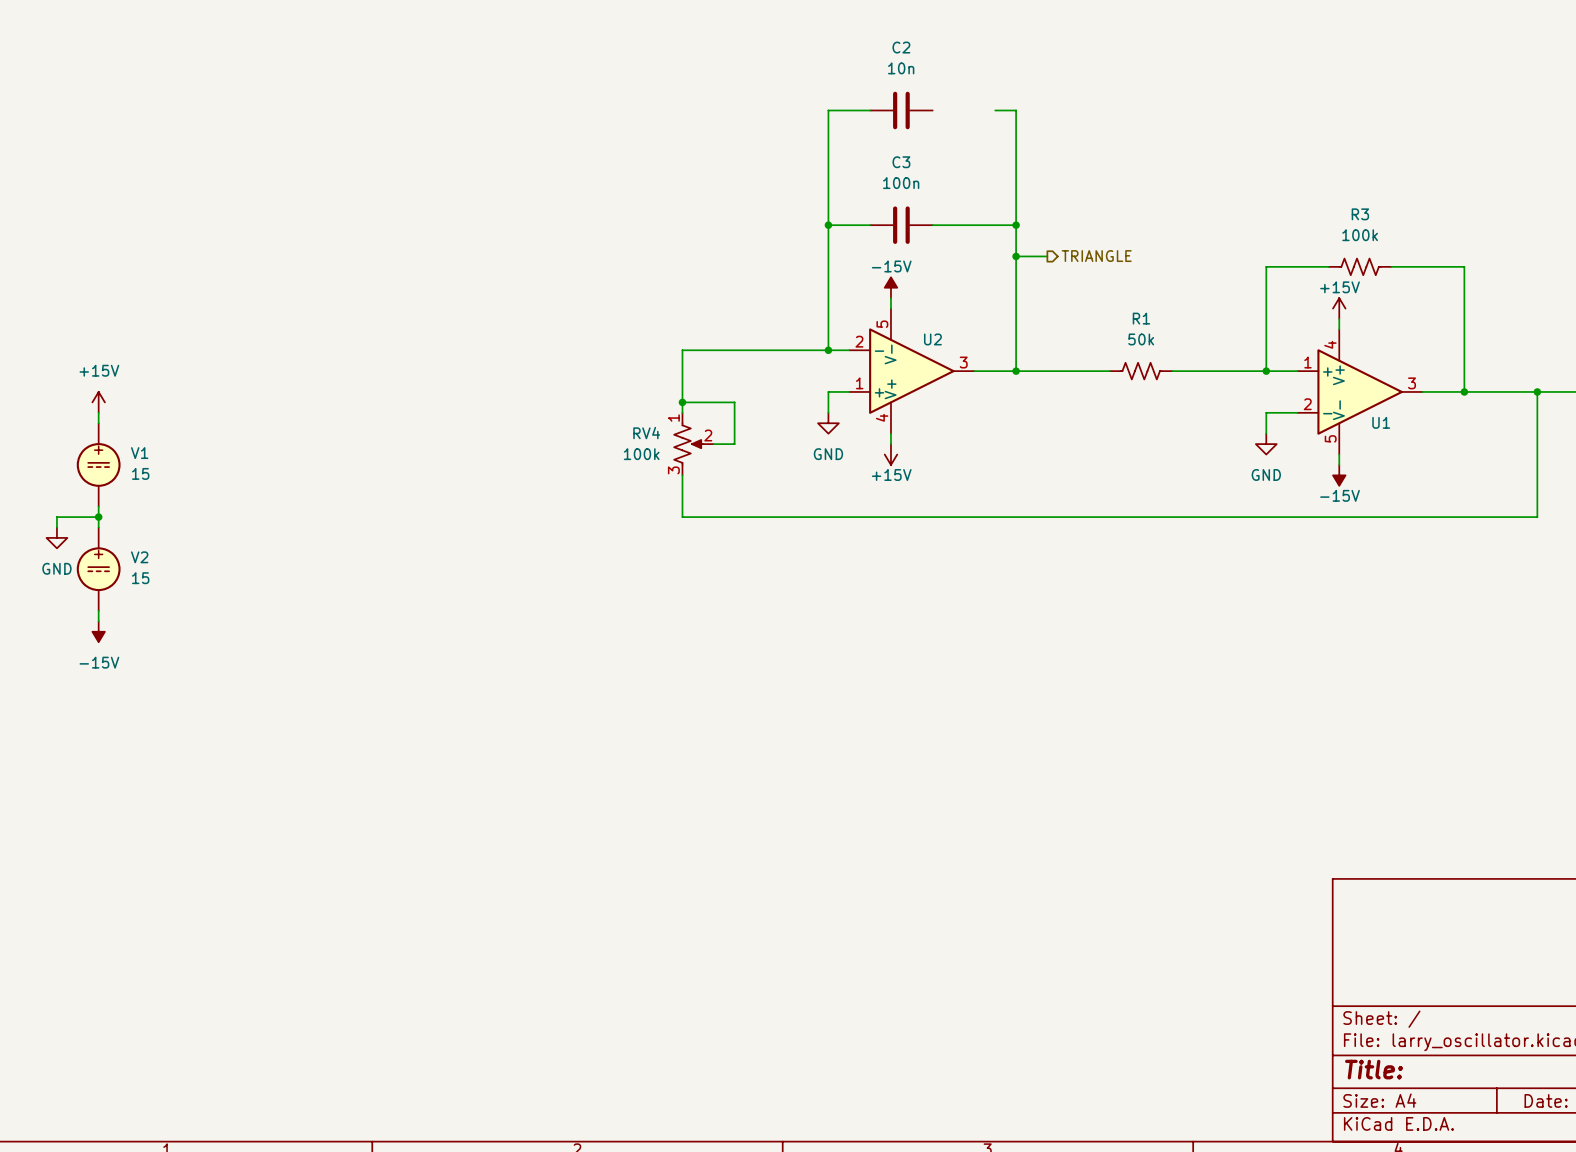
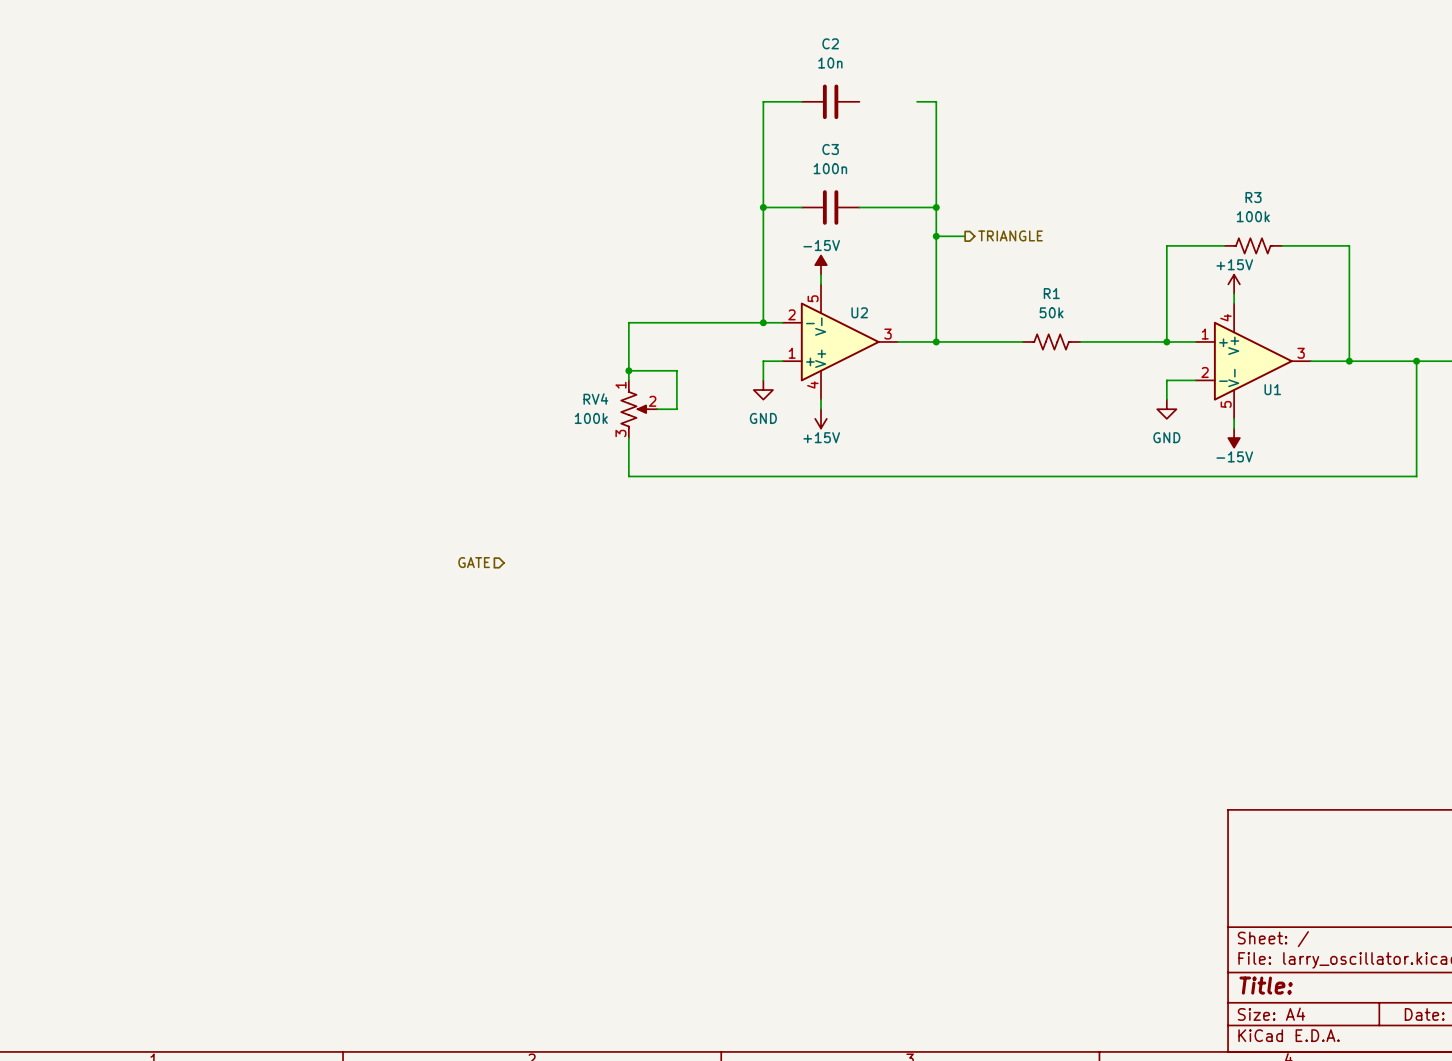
power symbol: +15V (98, 402) -> none
wire: (98, 412) (98, 423) -> none
V1: 15 (98, 464) -> none
wire: (98, 506) (98, 527) -> none
wire: (98, 517) (56, 517) (56, 527) -> none
junction: (98, 517) -> none
power symbol: GND (56, 537) -> none
V2: 15 (98, 569) -> none
wire: (98, 610) (98, 621) -> none
hierarchical label: none -> GATE (474, 562)
power symbol: -15V (98, 631) -> none

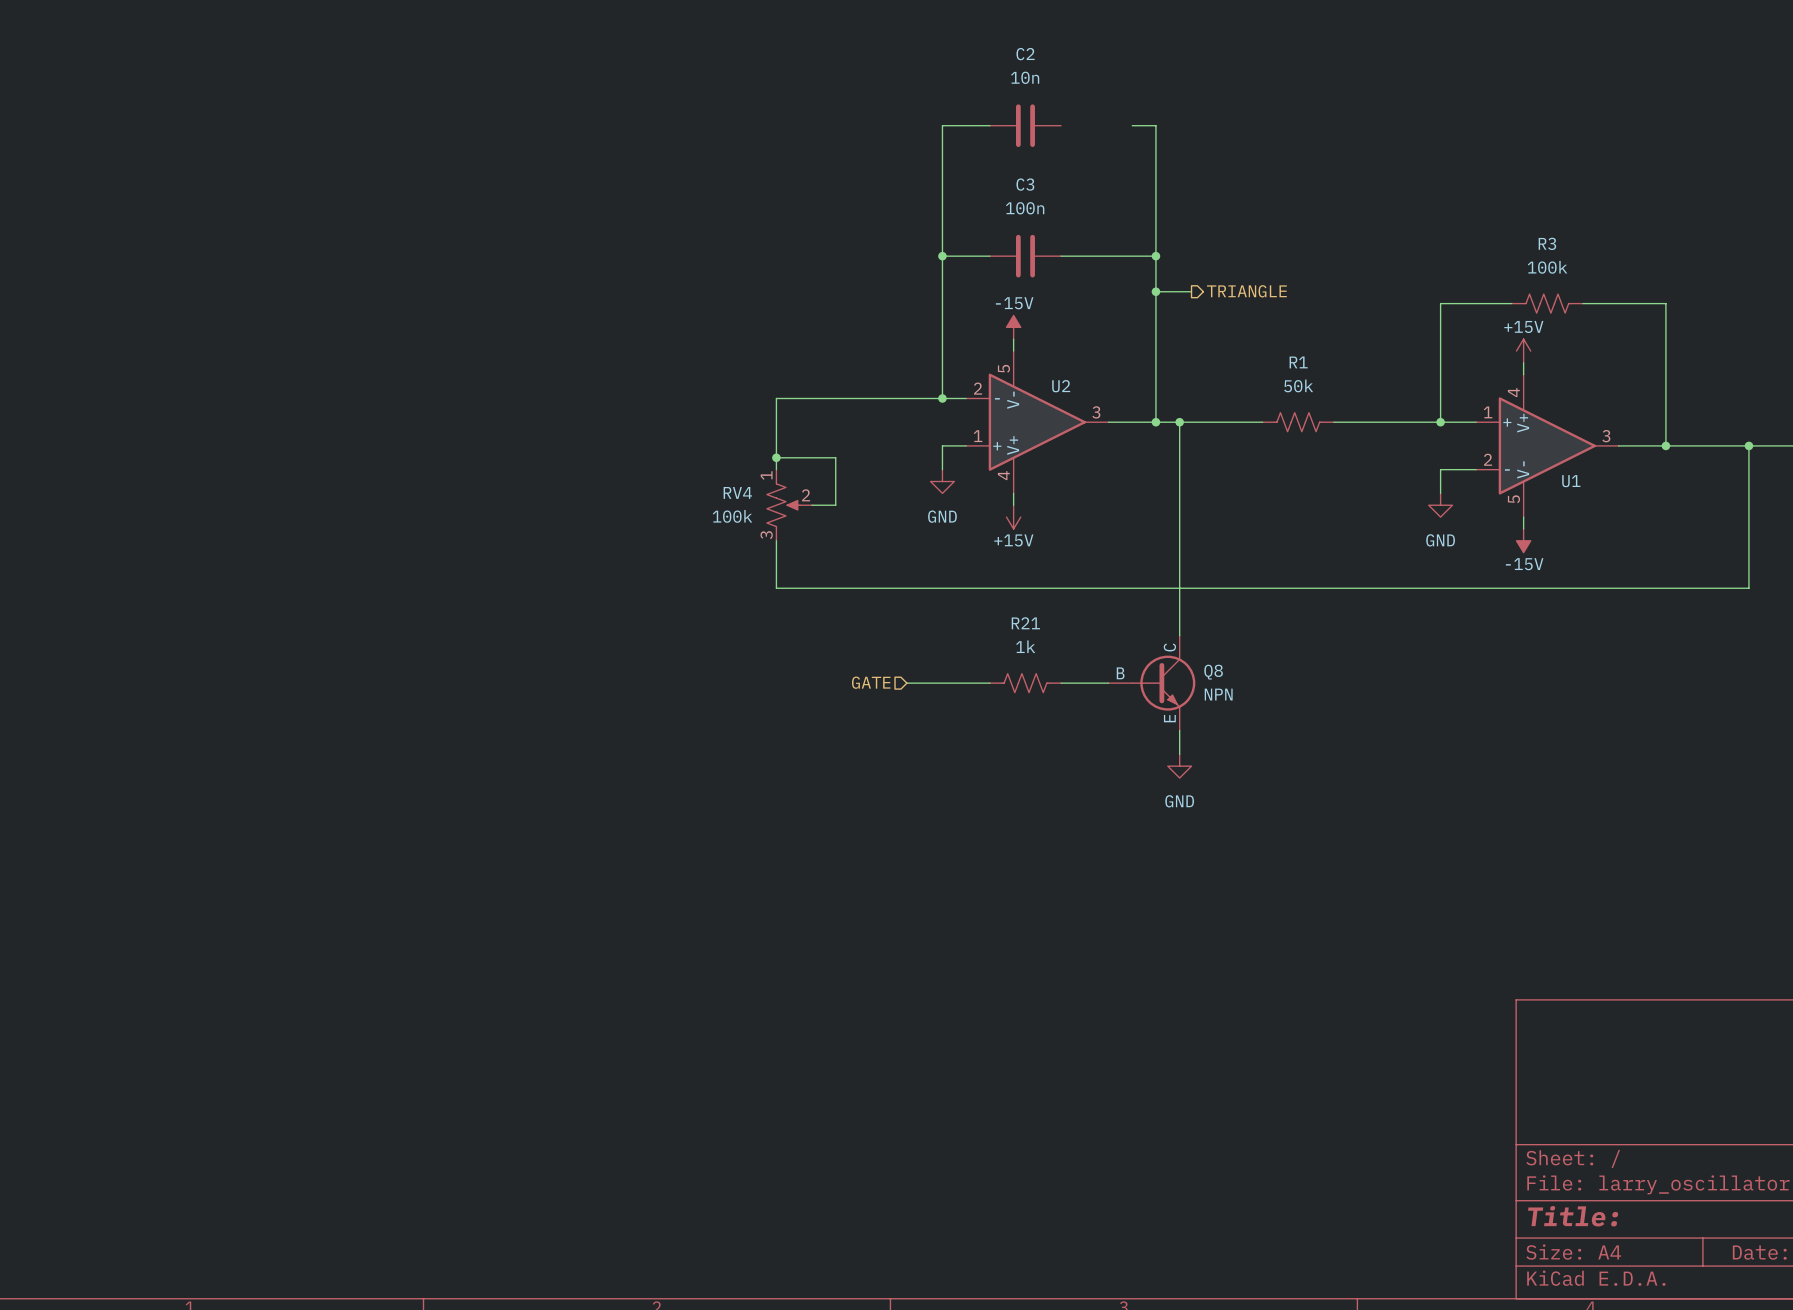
wire: none -> (1179, 422) (1179, 635)
junction: none -> (1179, 422)
hierarchical label: none -> GATE (871, 682)
wire: none -> (906, 683) (989, 683)
R21: none -> 1k (1025, 683)
wire: none -> (1061, 683) (1108, 683)
Q8: none -> NPN (1151, 683)
hierarchical label: GATE (474, 562) -> none
wire: none -> (1179, 730) (1179, 754)
power symbol: none -> GND (1179, 766)

